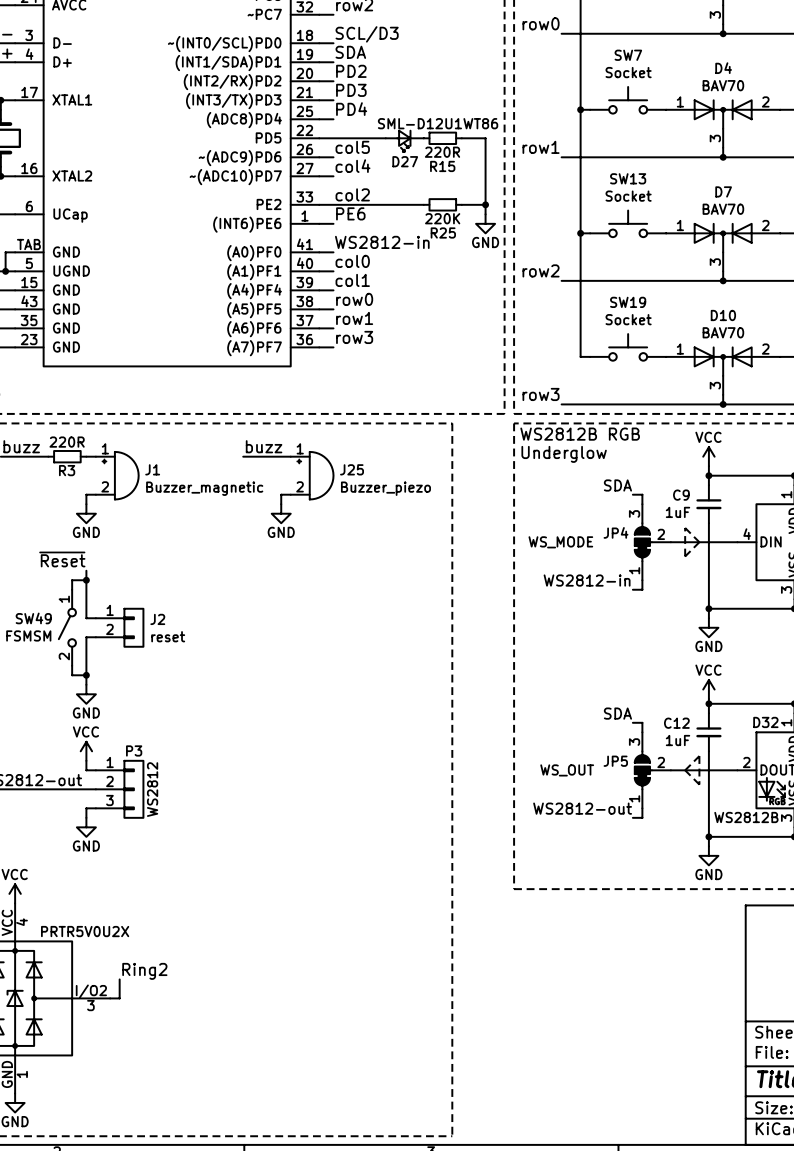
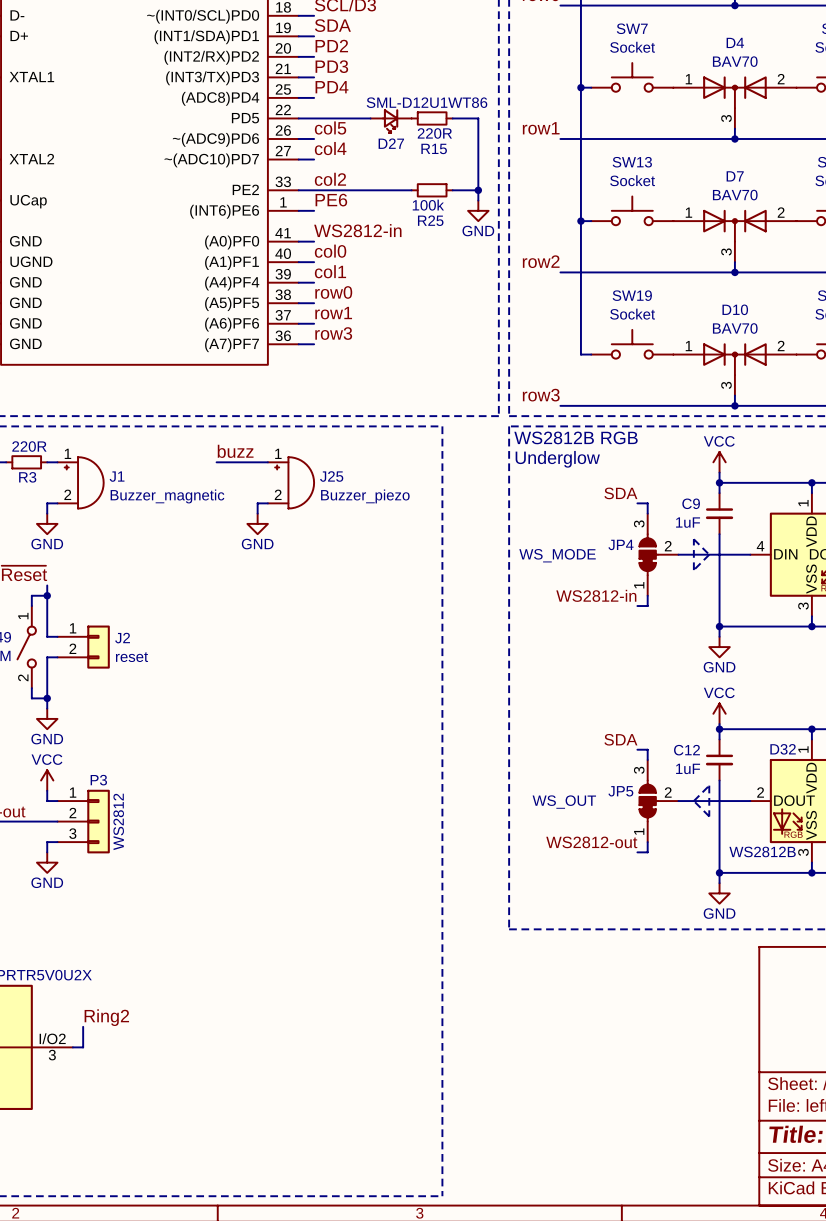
R25 value: 220K (442, 218) -> 100k (428, 205)

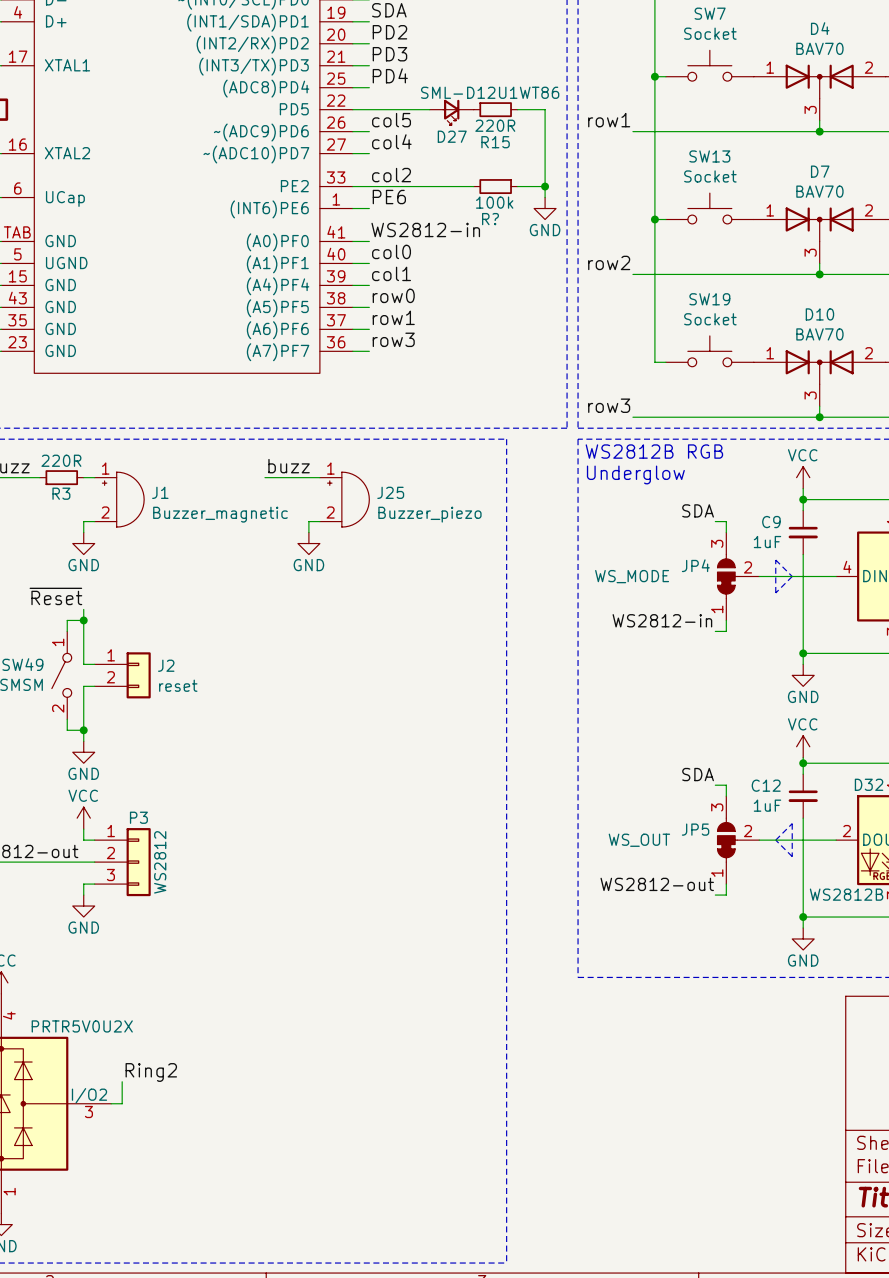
R25 name: R25 (430, 220) -> R? (490, 219)

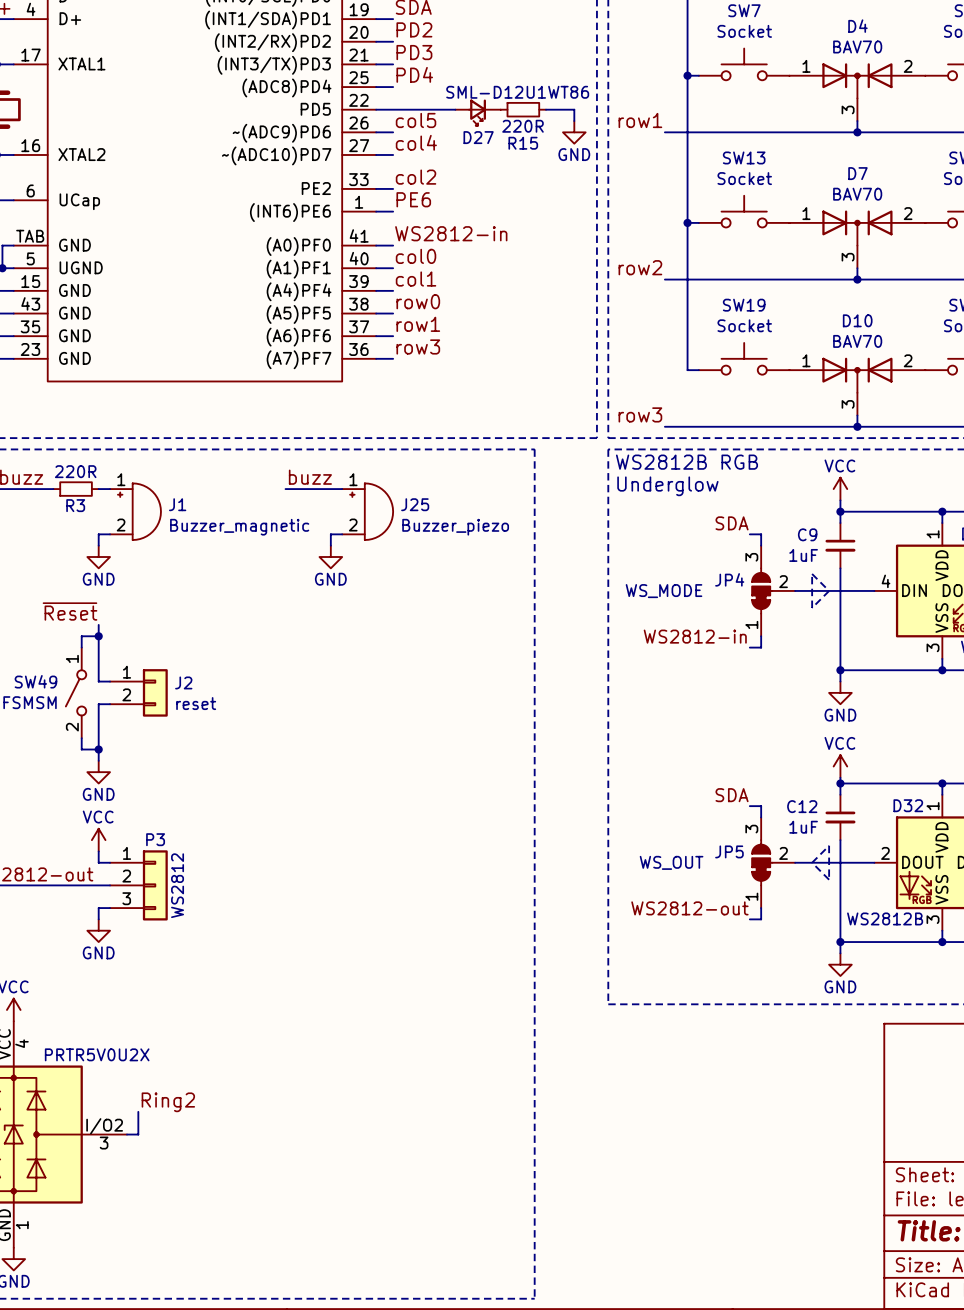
wire: (545, 120) (545, 197) -> none
wire: (369, 186) (473, 186) -> none
R?: 100k (495, 186) -> none
wire: (517, 186) (545, 186) -> none
junction: (545, 186) -> none
power symbol position: GND (545, 208) -> GND (574, 132)

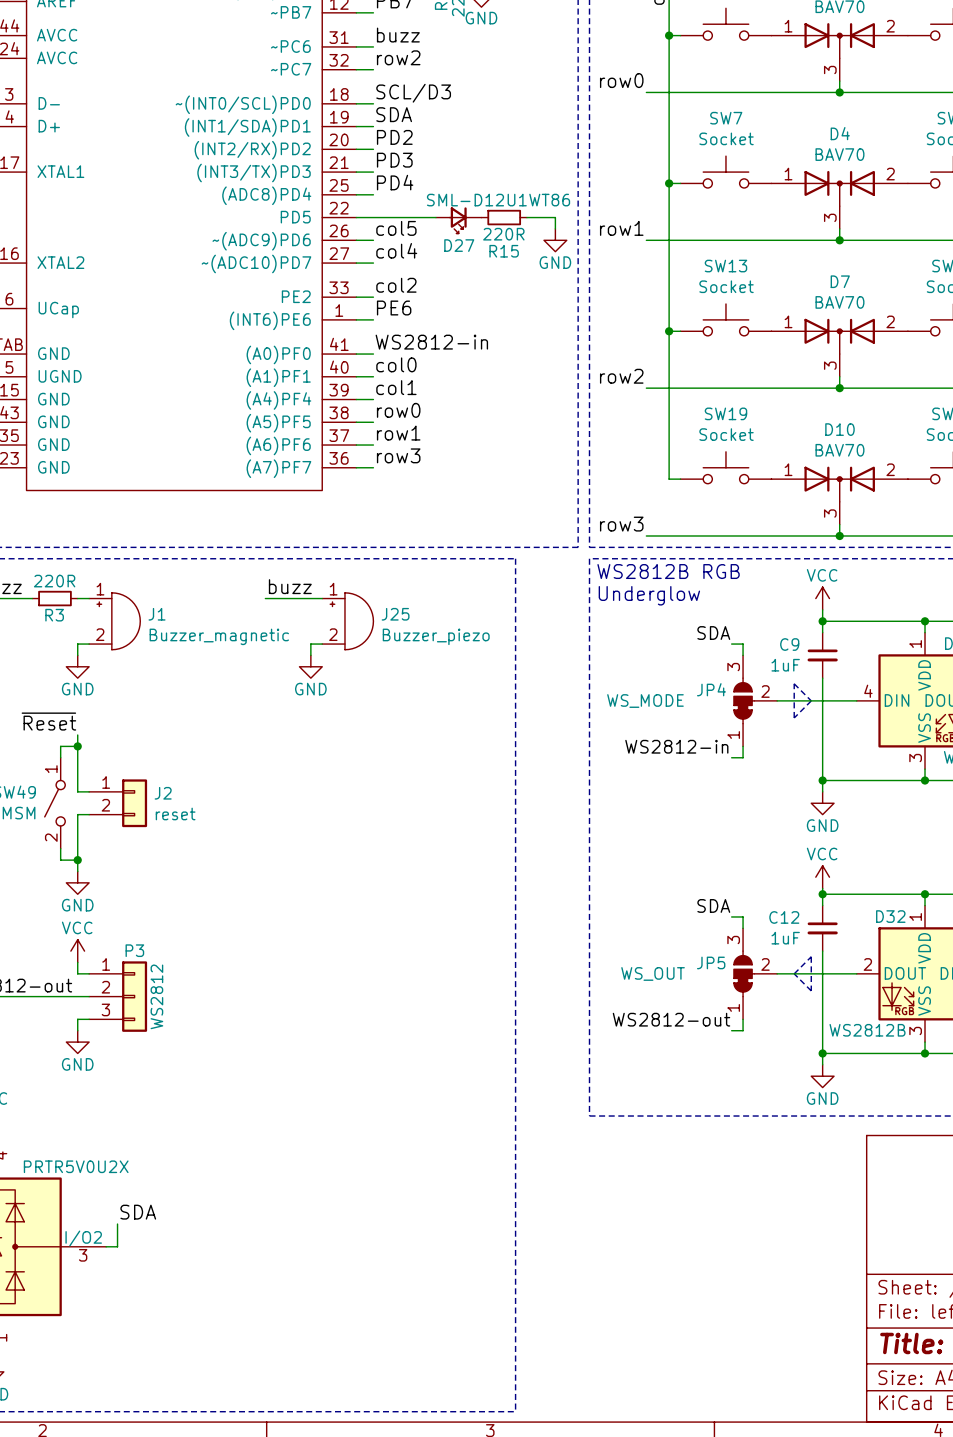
label: Ring2 (168, 1102) -> SDA (138, 1212)

